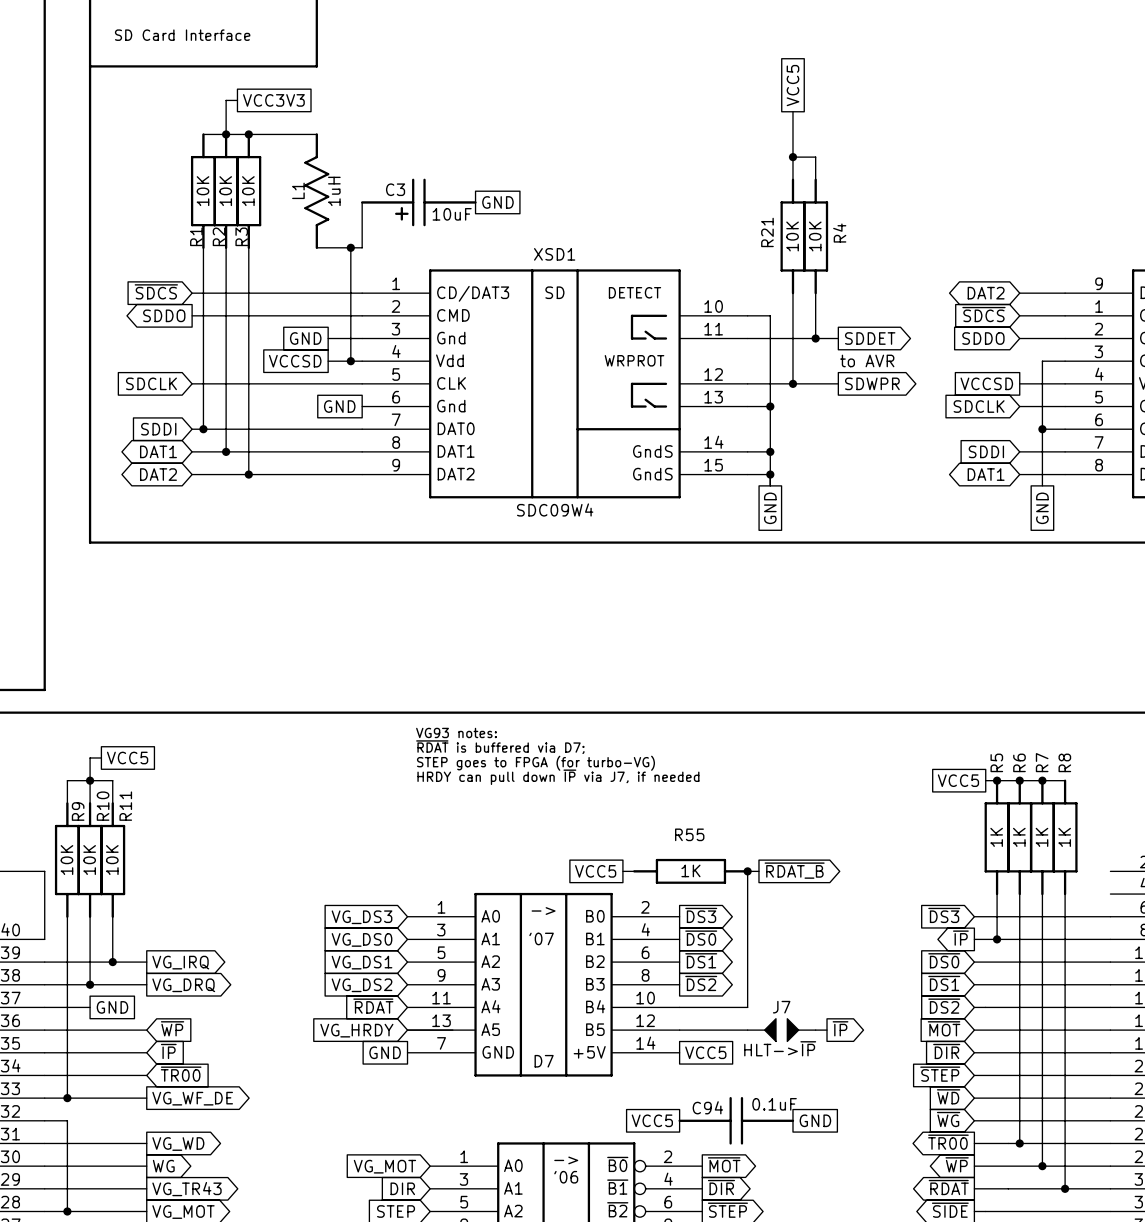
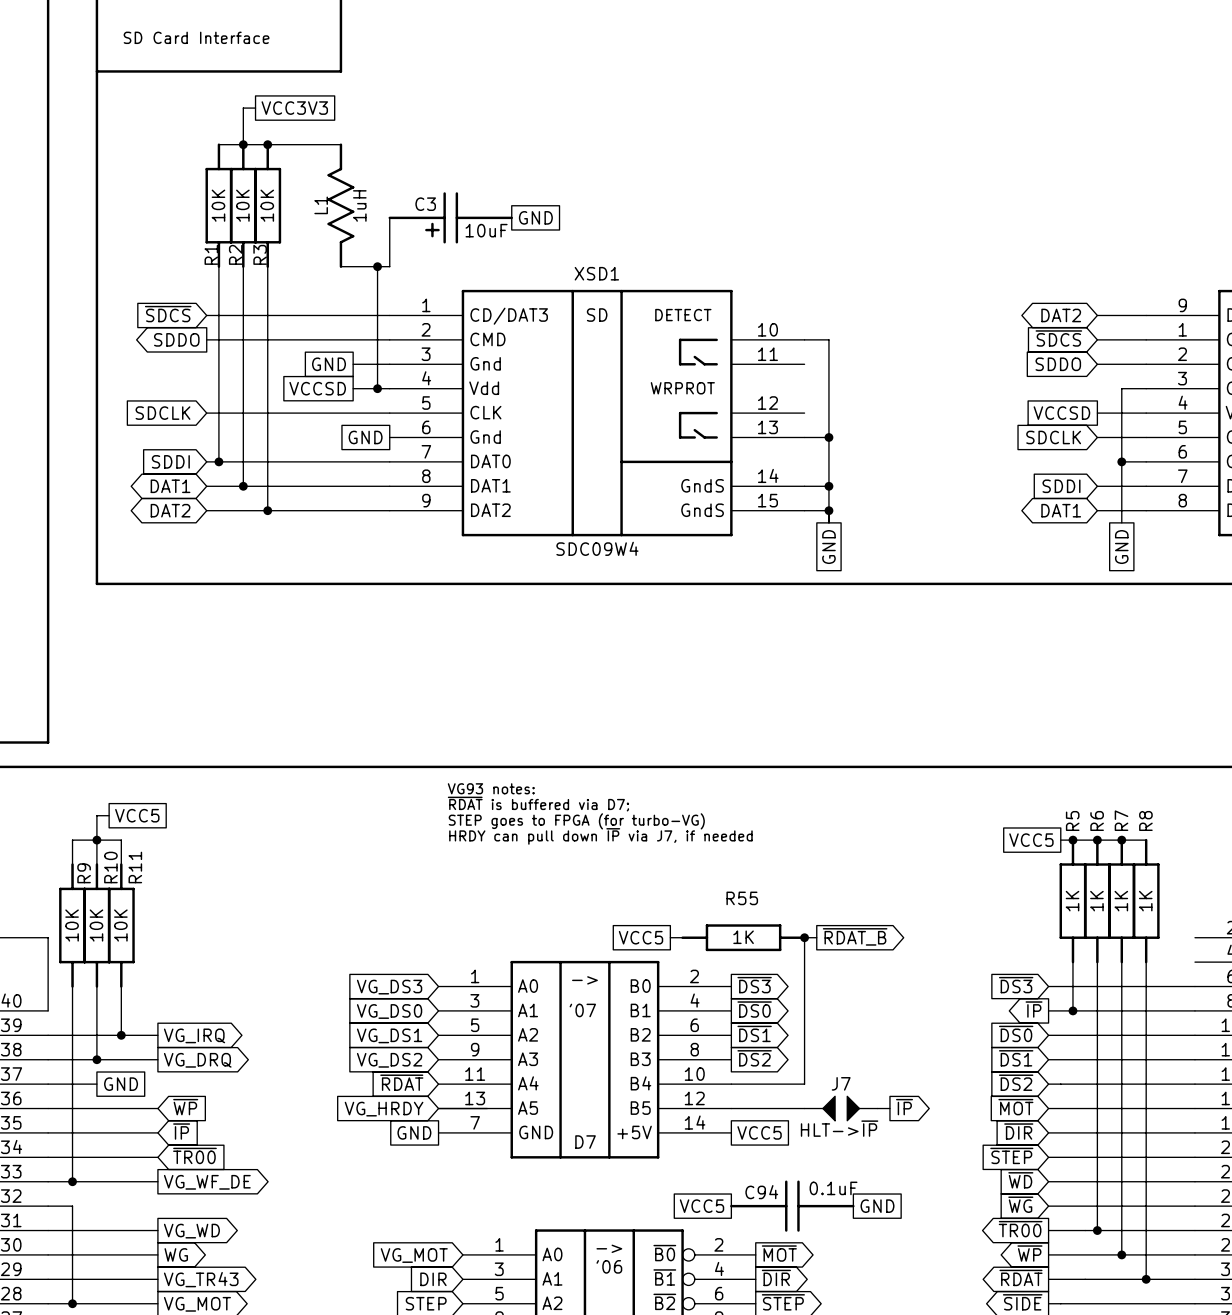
global label: VCC5 (792, 85) -> none
wire: (792, 111) (792, 179) -> none
wire: (792, 157) (815, 157) (815, 179) -> none
junction: (792, 157) -> none
R21: 10K (792, 236) -> none
R4: 10K (815, 236) -> none
wire: (792, 293) (792, 383) -> none
wire: (815, 293) (815, 338) -> none
wire: (747, 338) (838, 338) -> none
junction: (815, 338) -> none
global label: SDDET (870, 338) -> none
text: to AVR (867, 360) -> none
wire: (747, 383) (838, 383) -> none
junction: (792, 383) -> none
global label: SDWPR (872, 383) -> none

